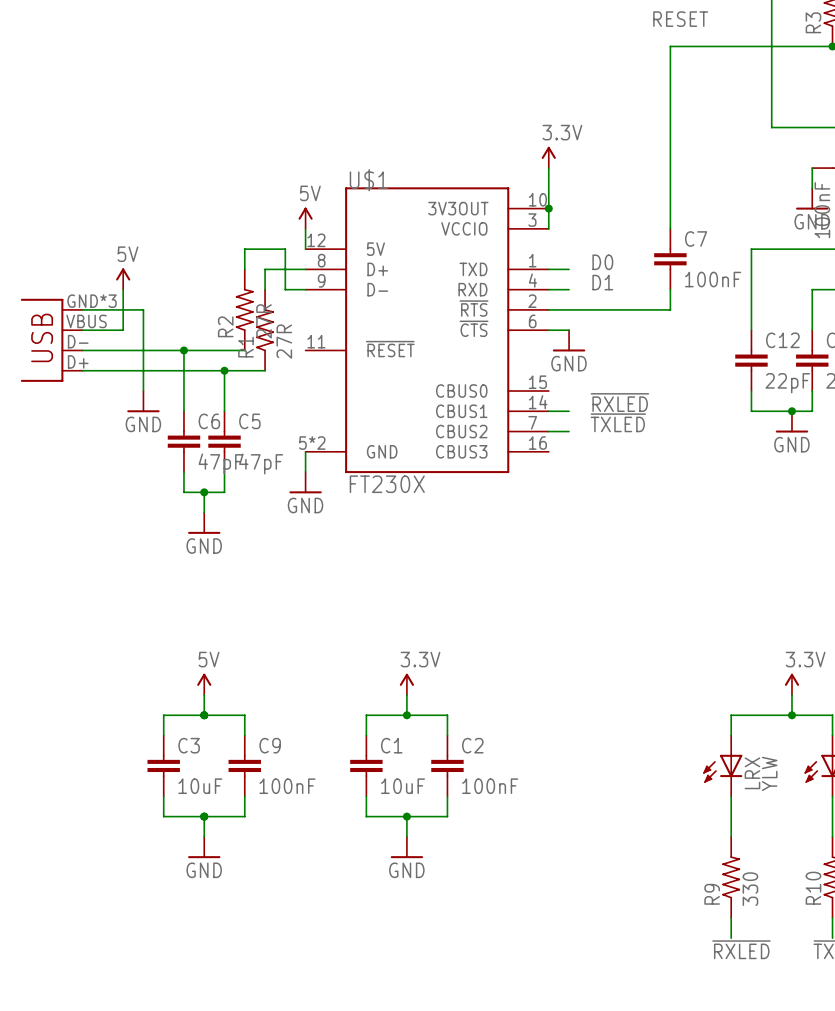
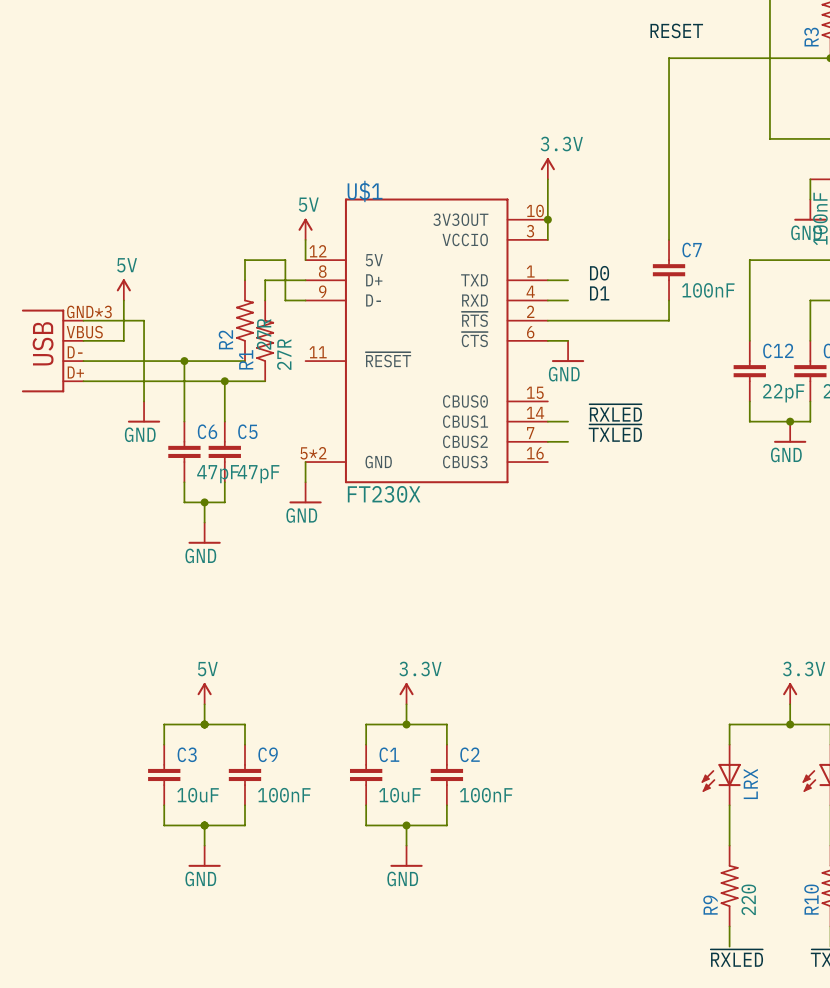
LRX value: YLW (769, 773) -> none
R9 value: 330 (750, 889) -> 220 (748, 899)

